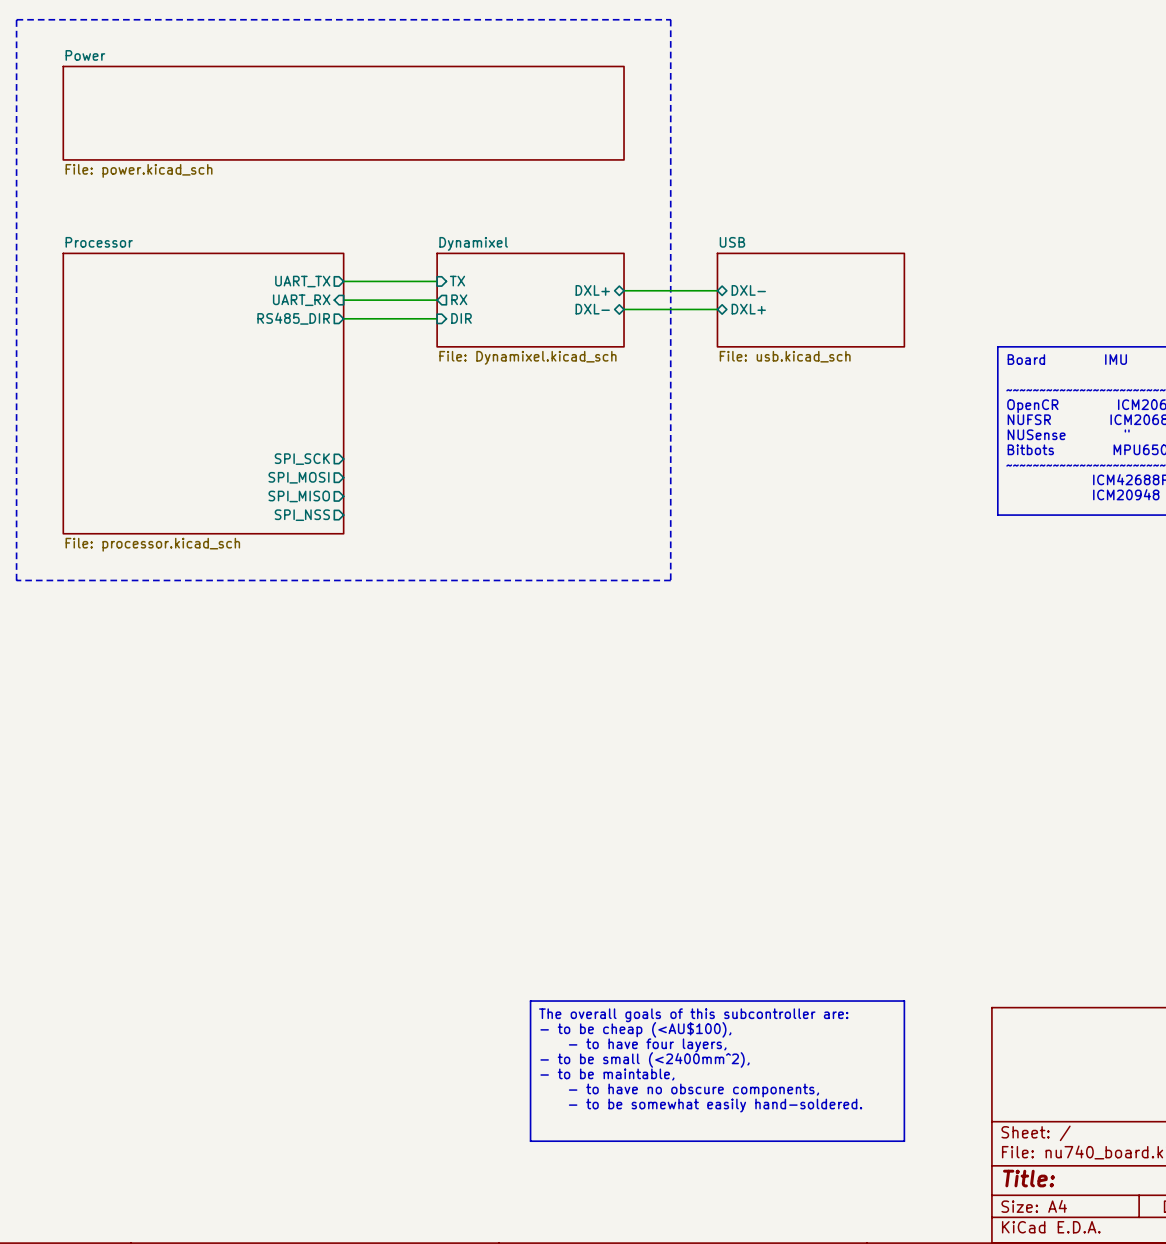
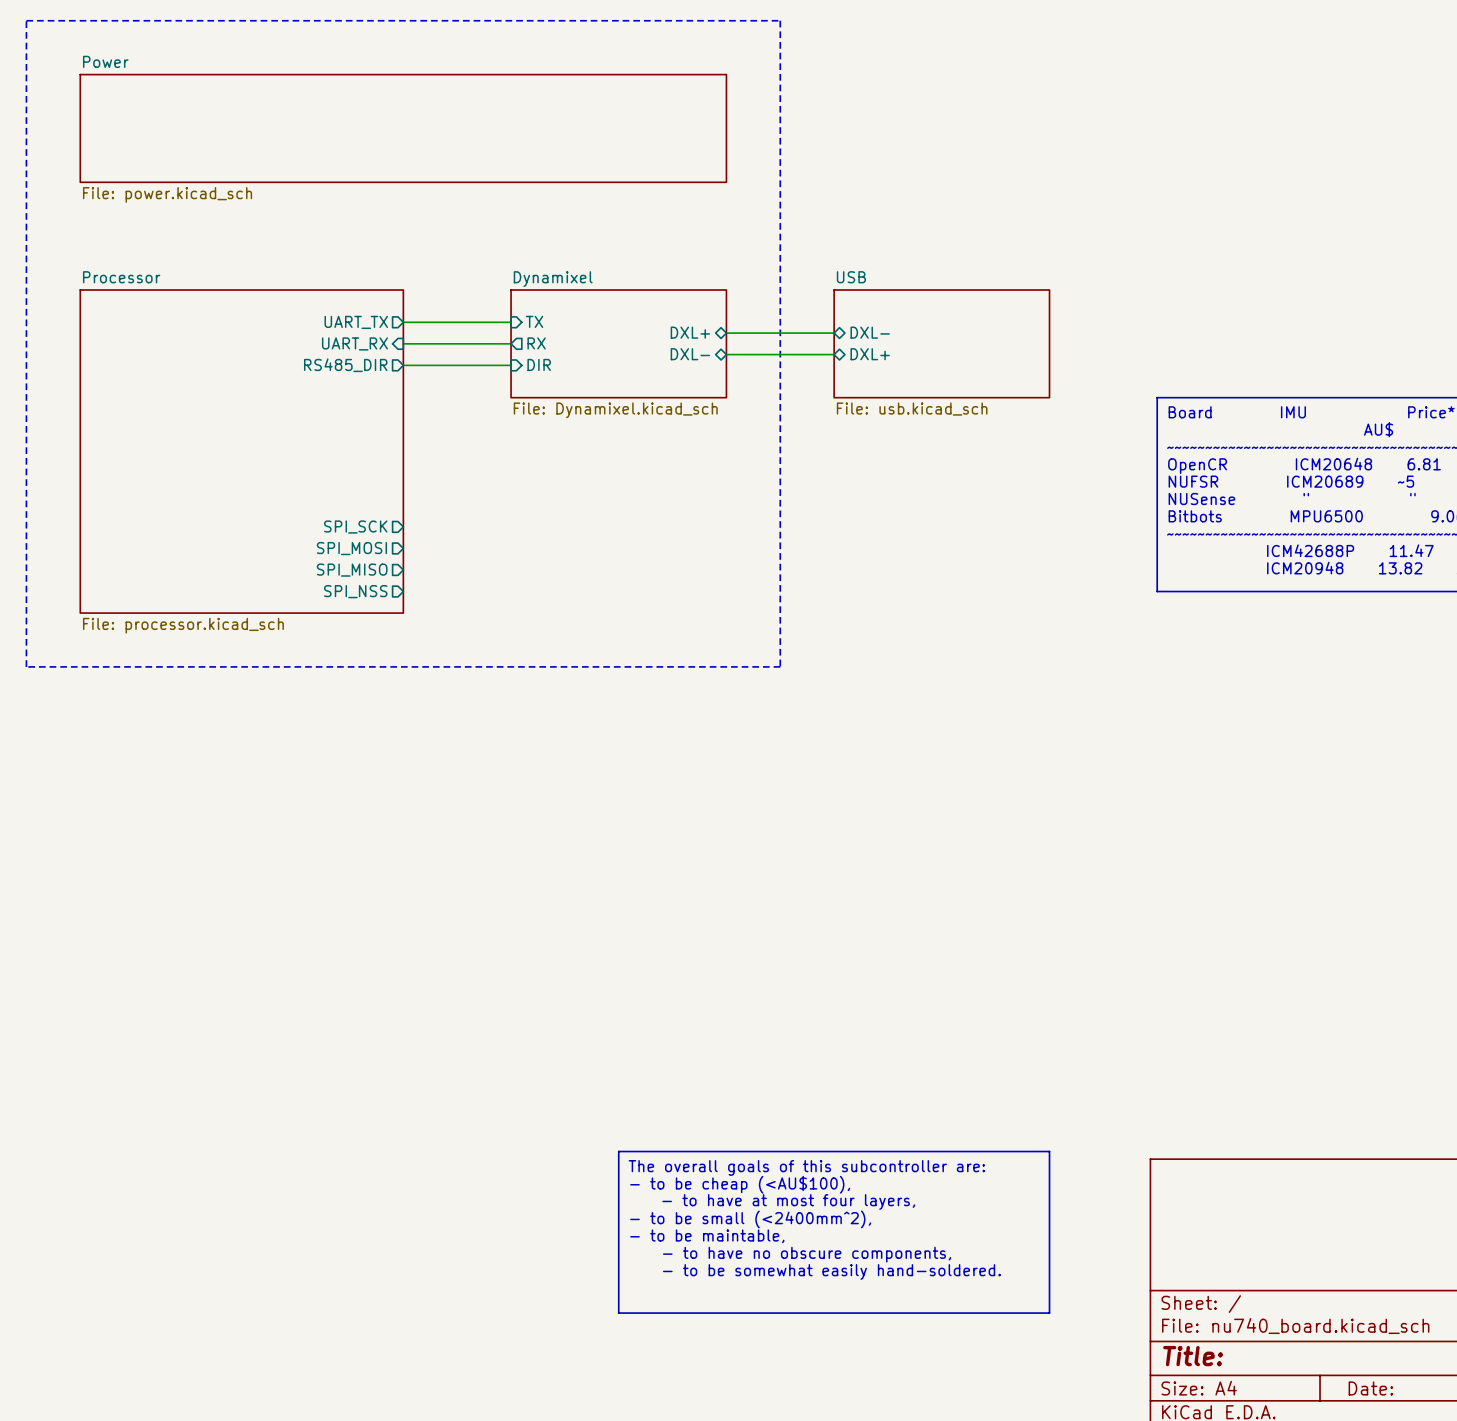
text: - to have four layers, (647, 1045) -> - to have at most four layers, (788, 1201)

